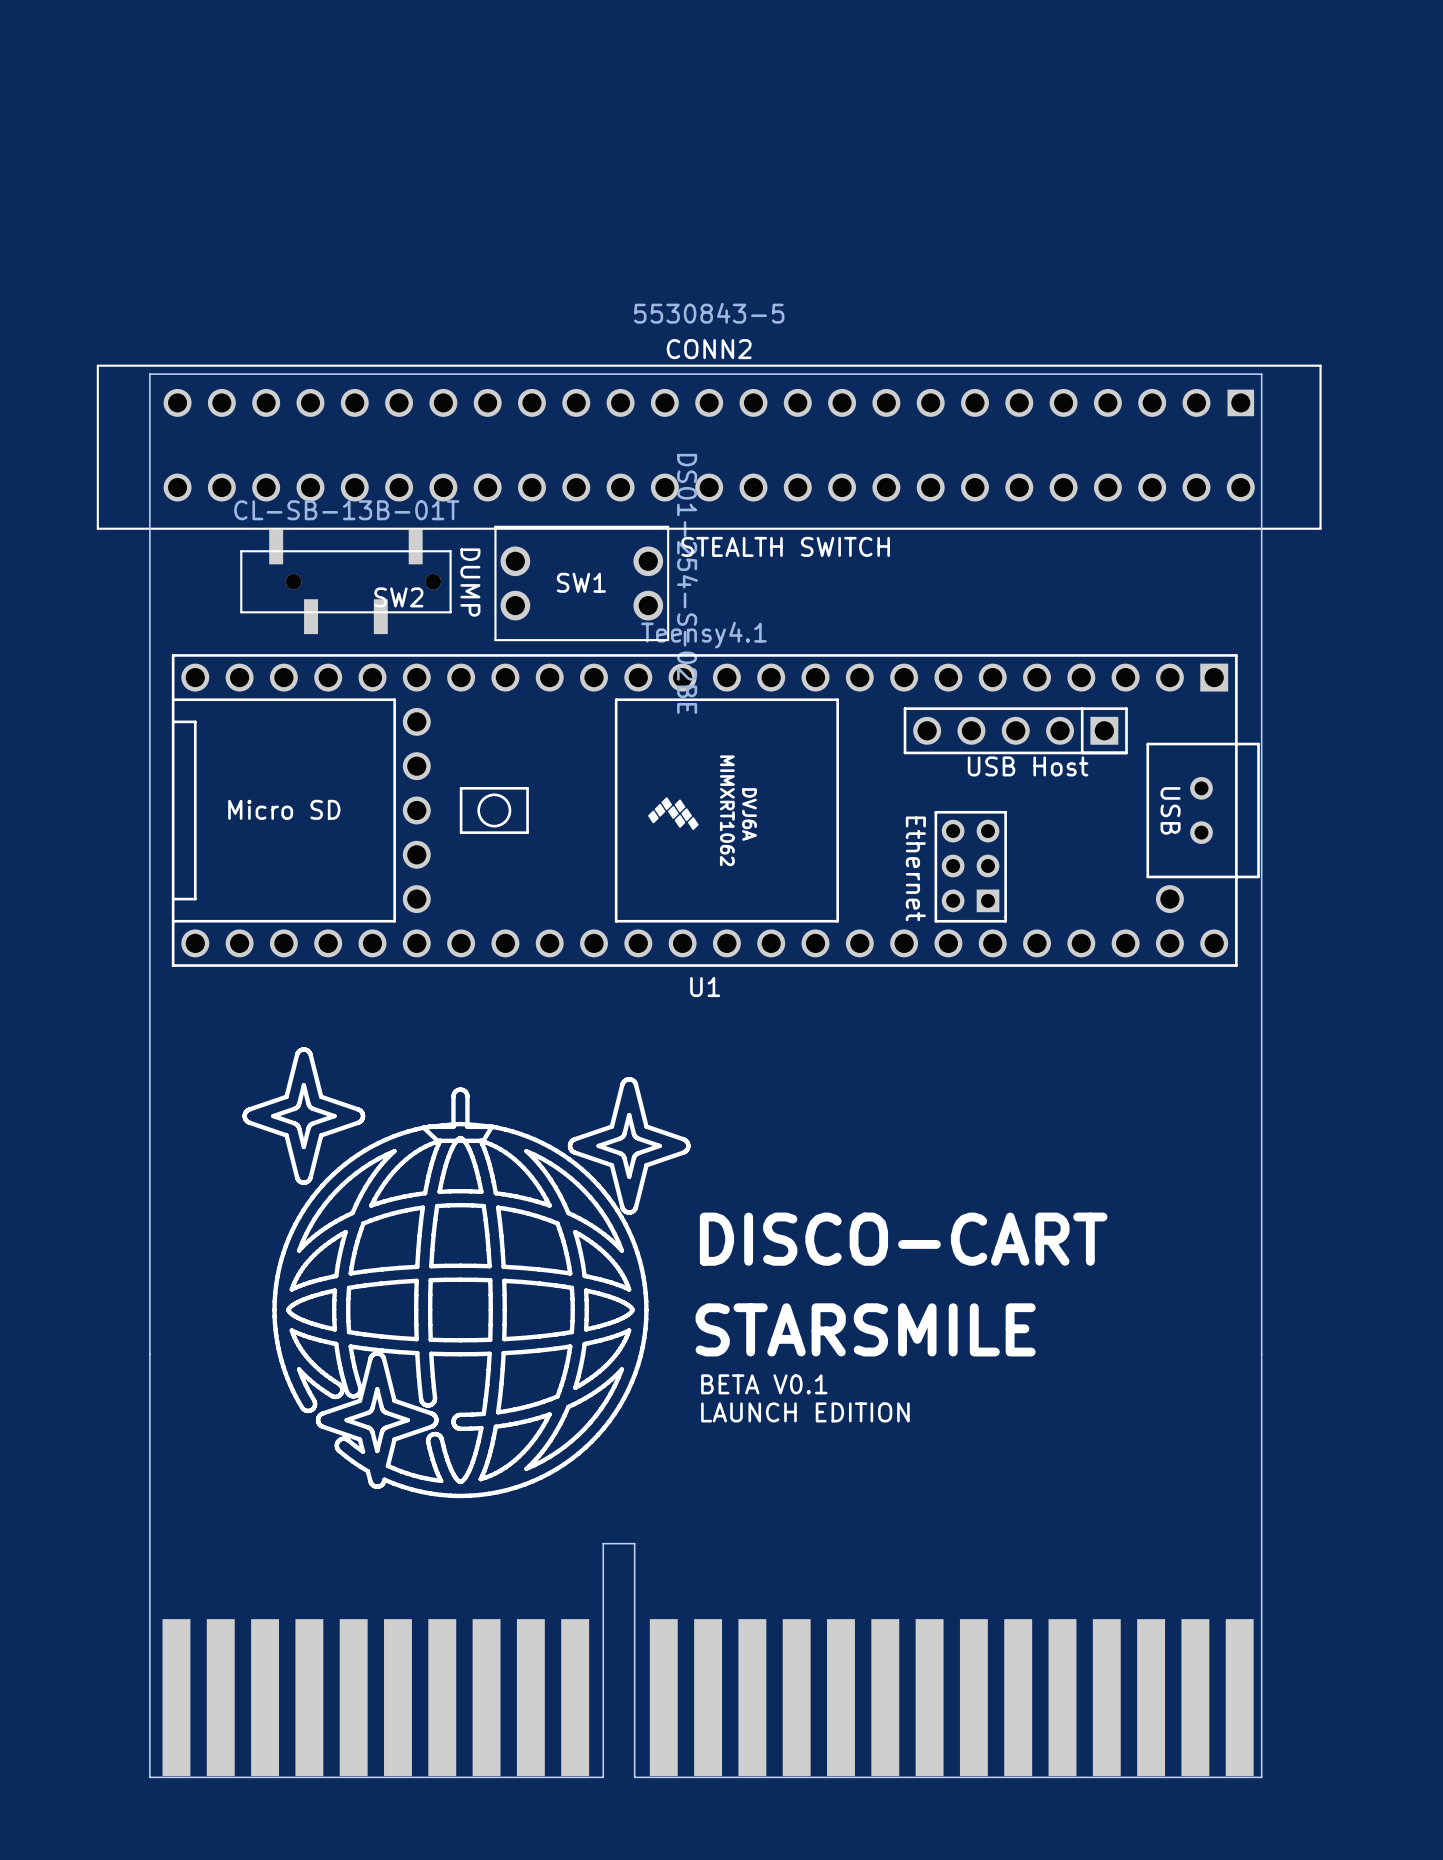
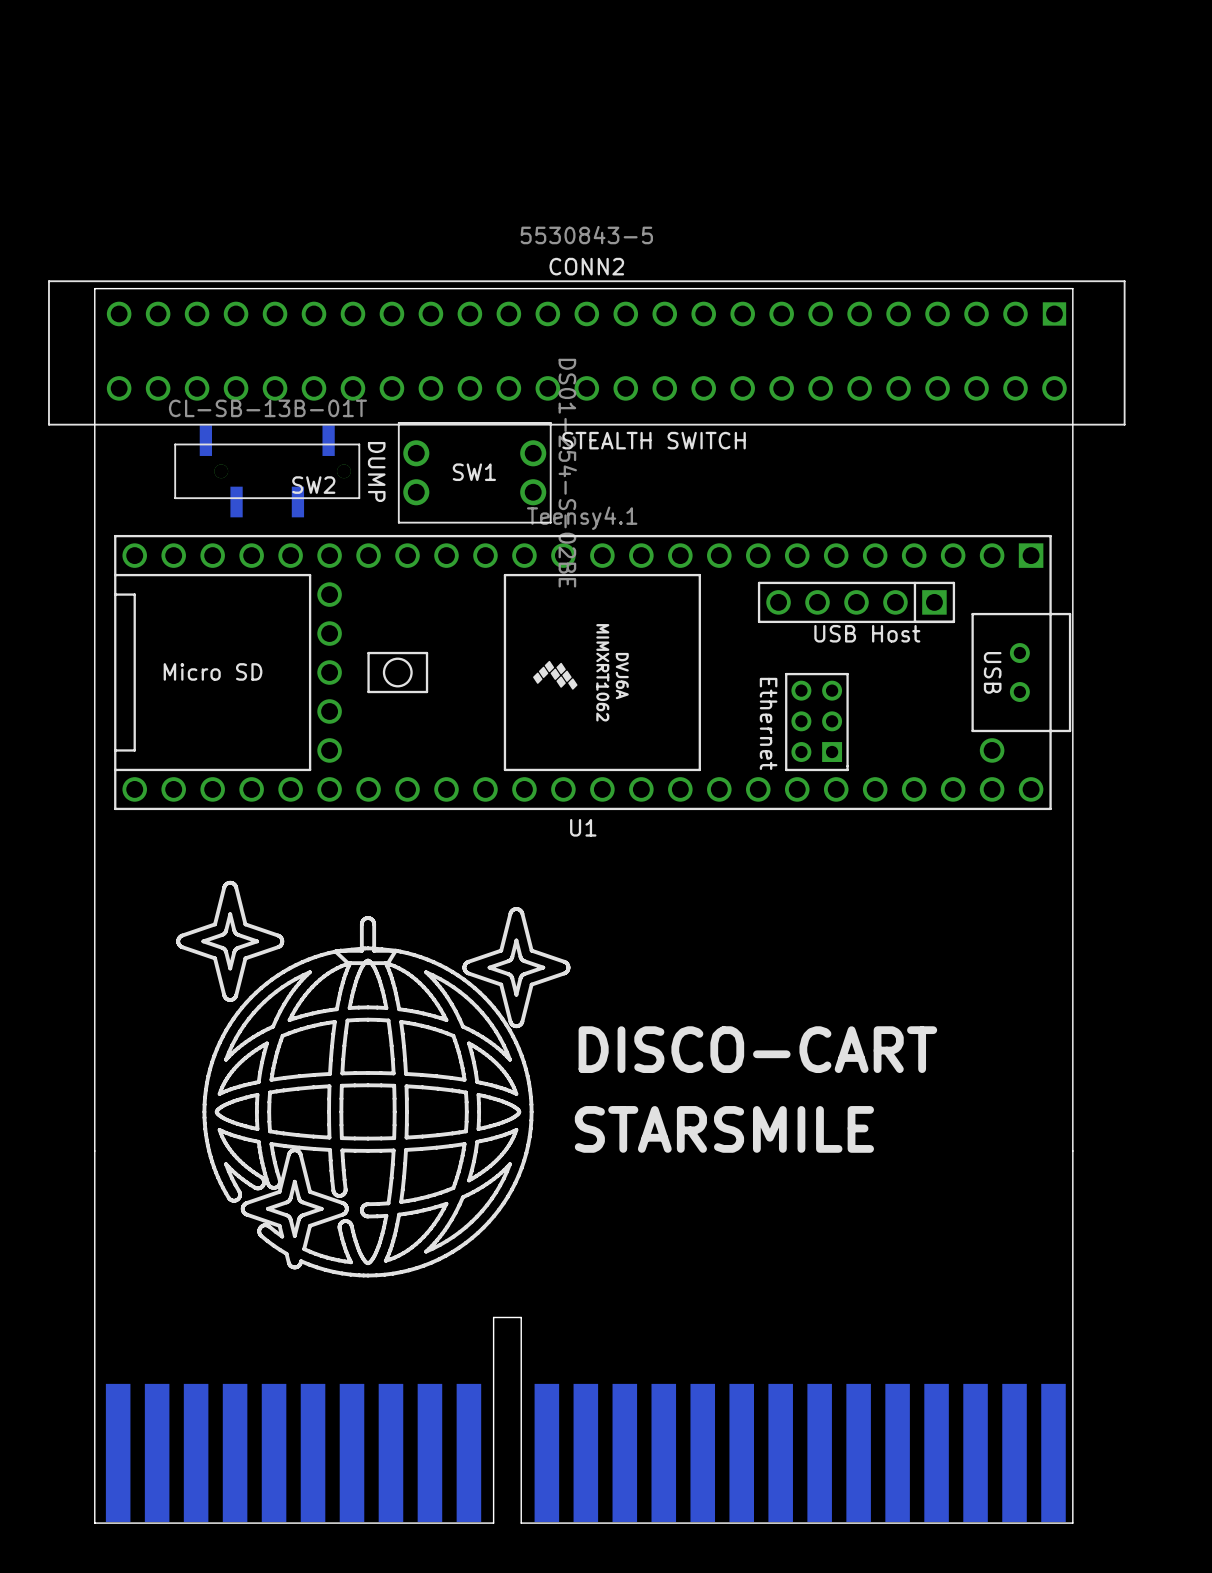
text: BETA V0.1 (764, 1384) -> none
text: LAUNCH EDITION (805, 1412) -> none

